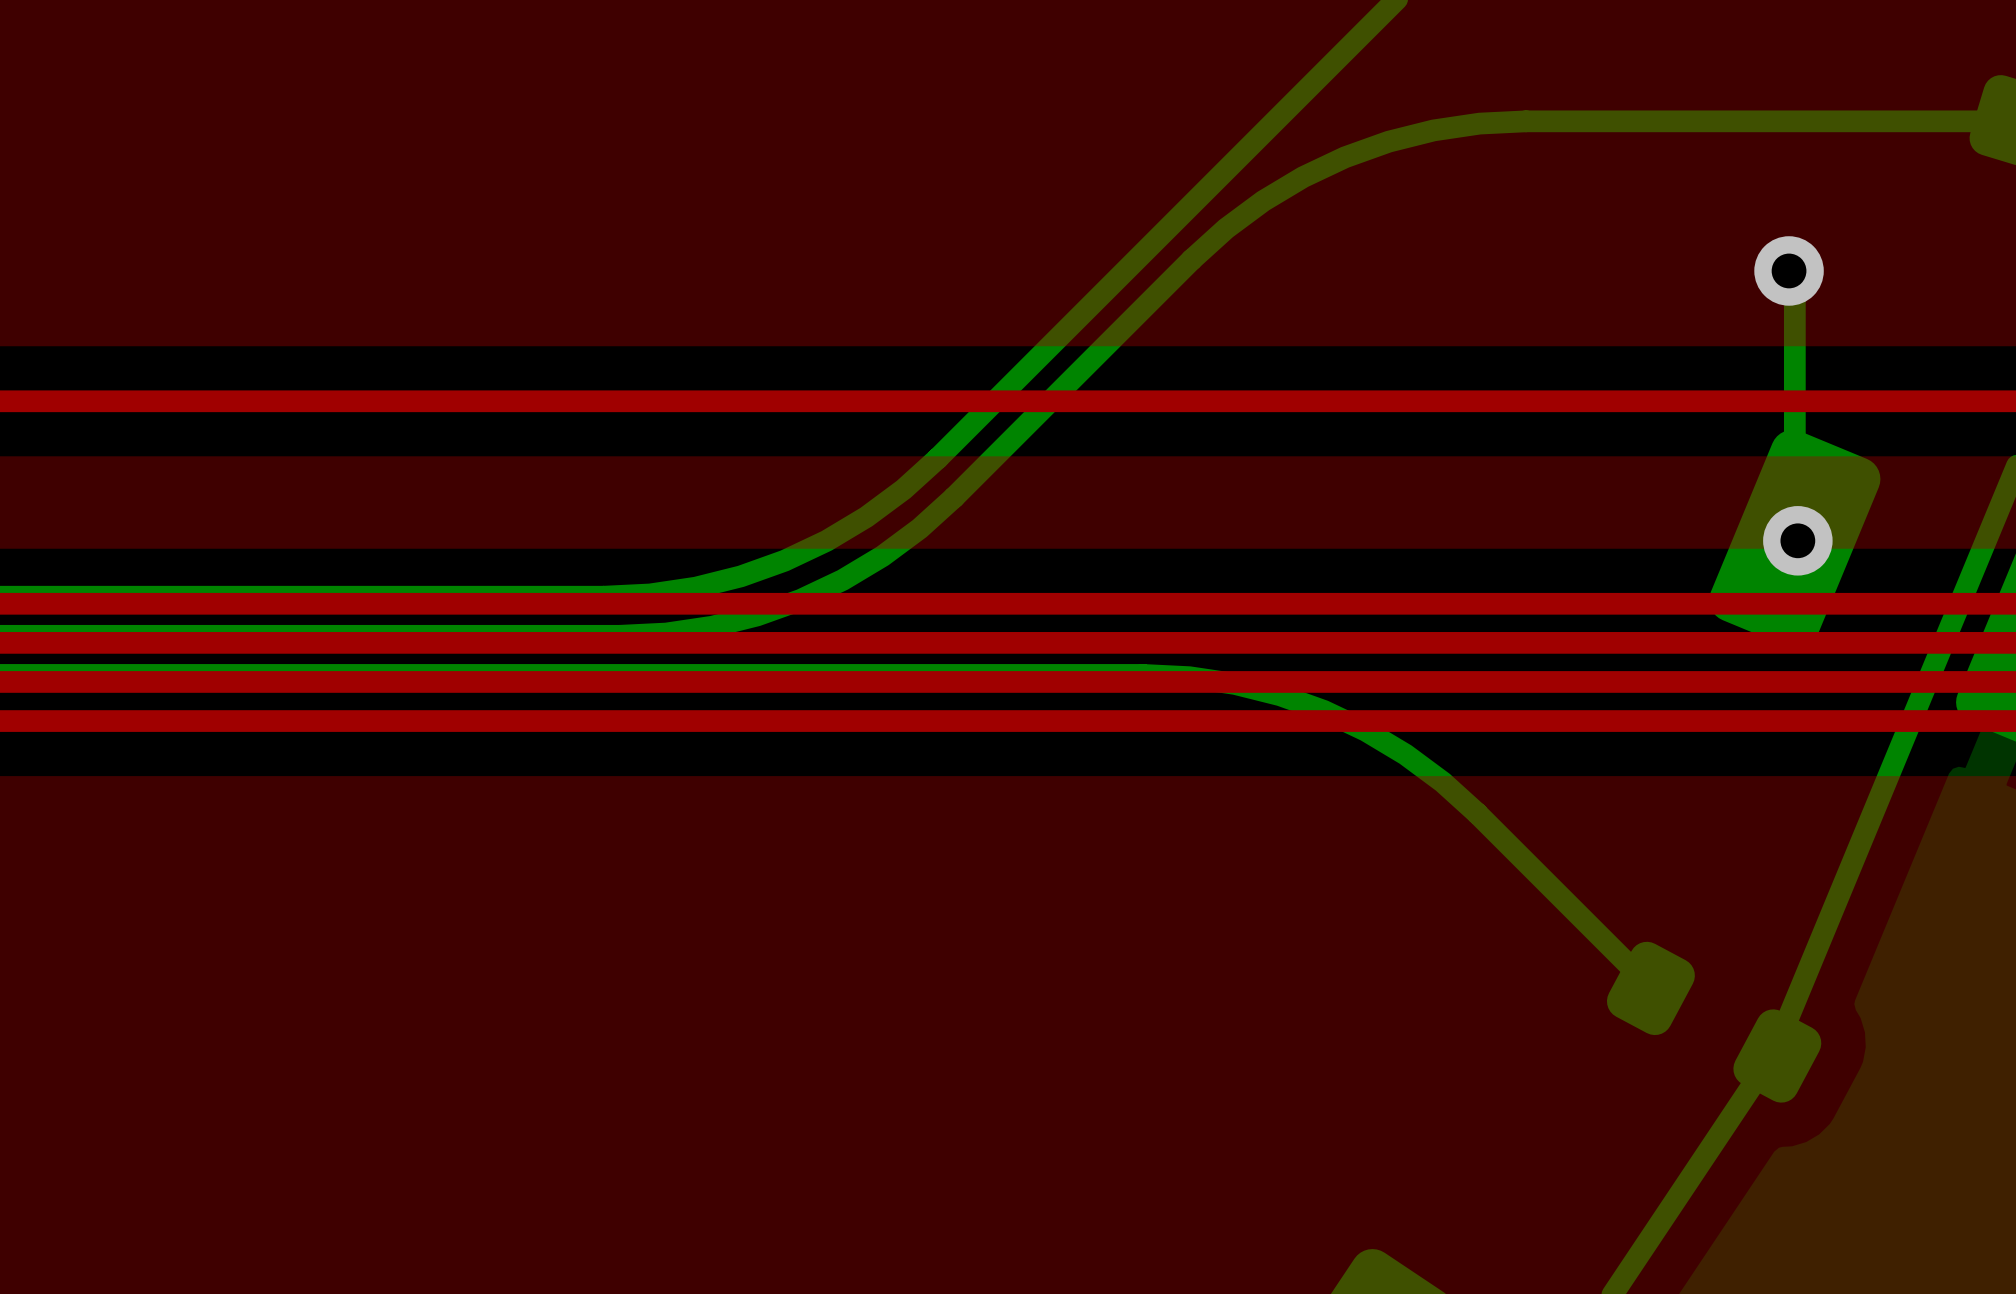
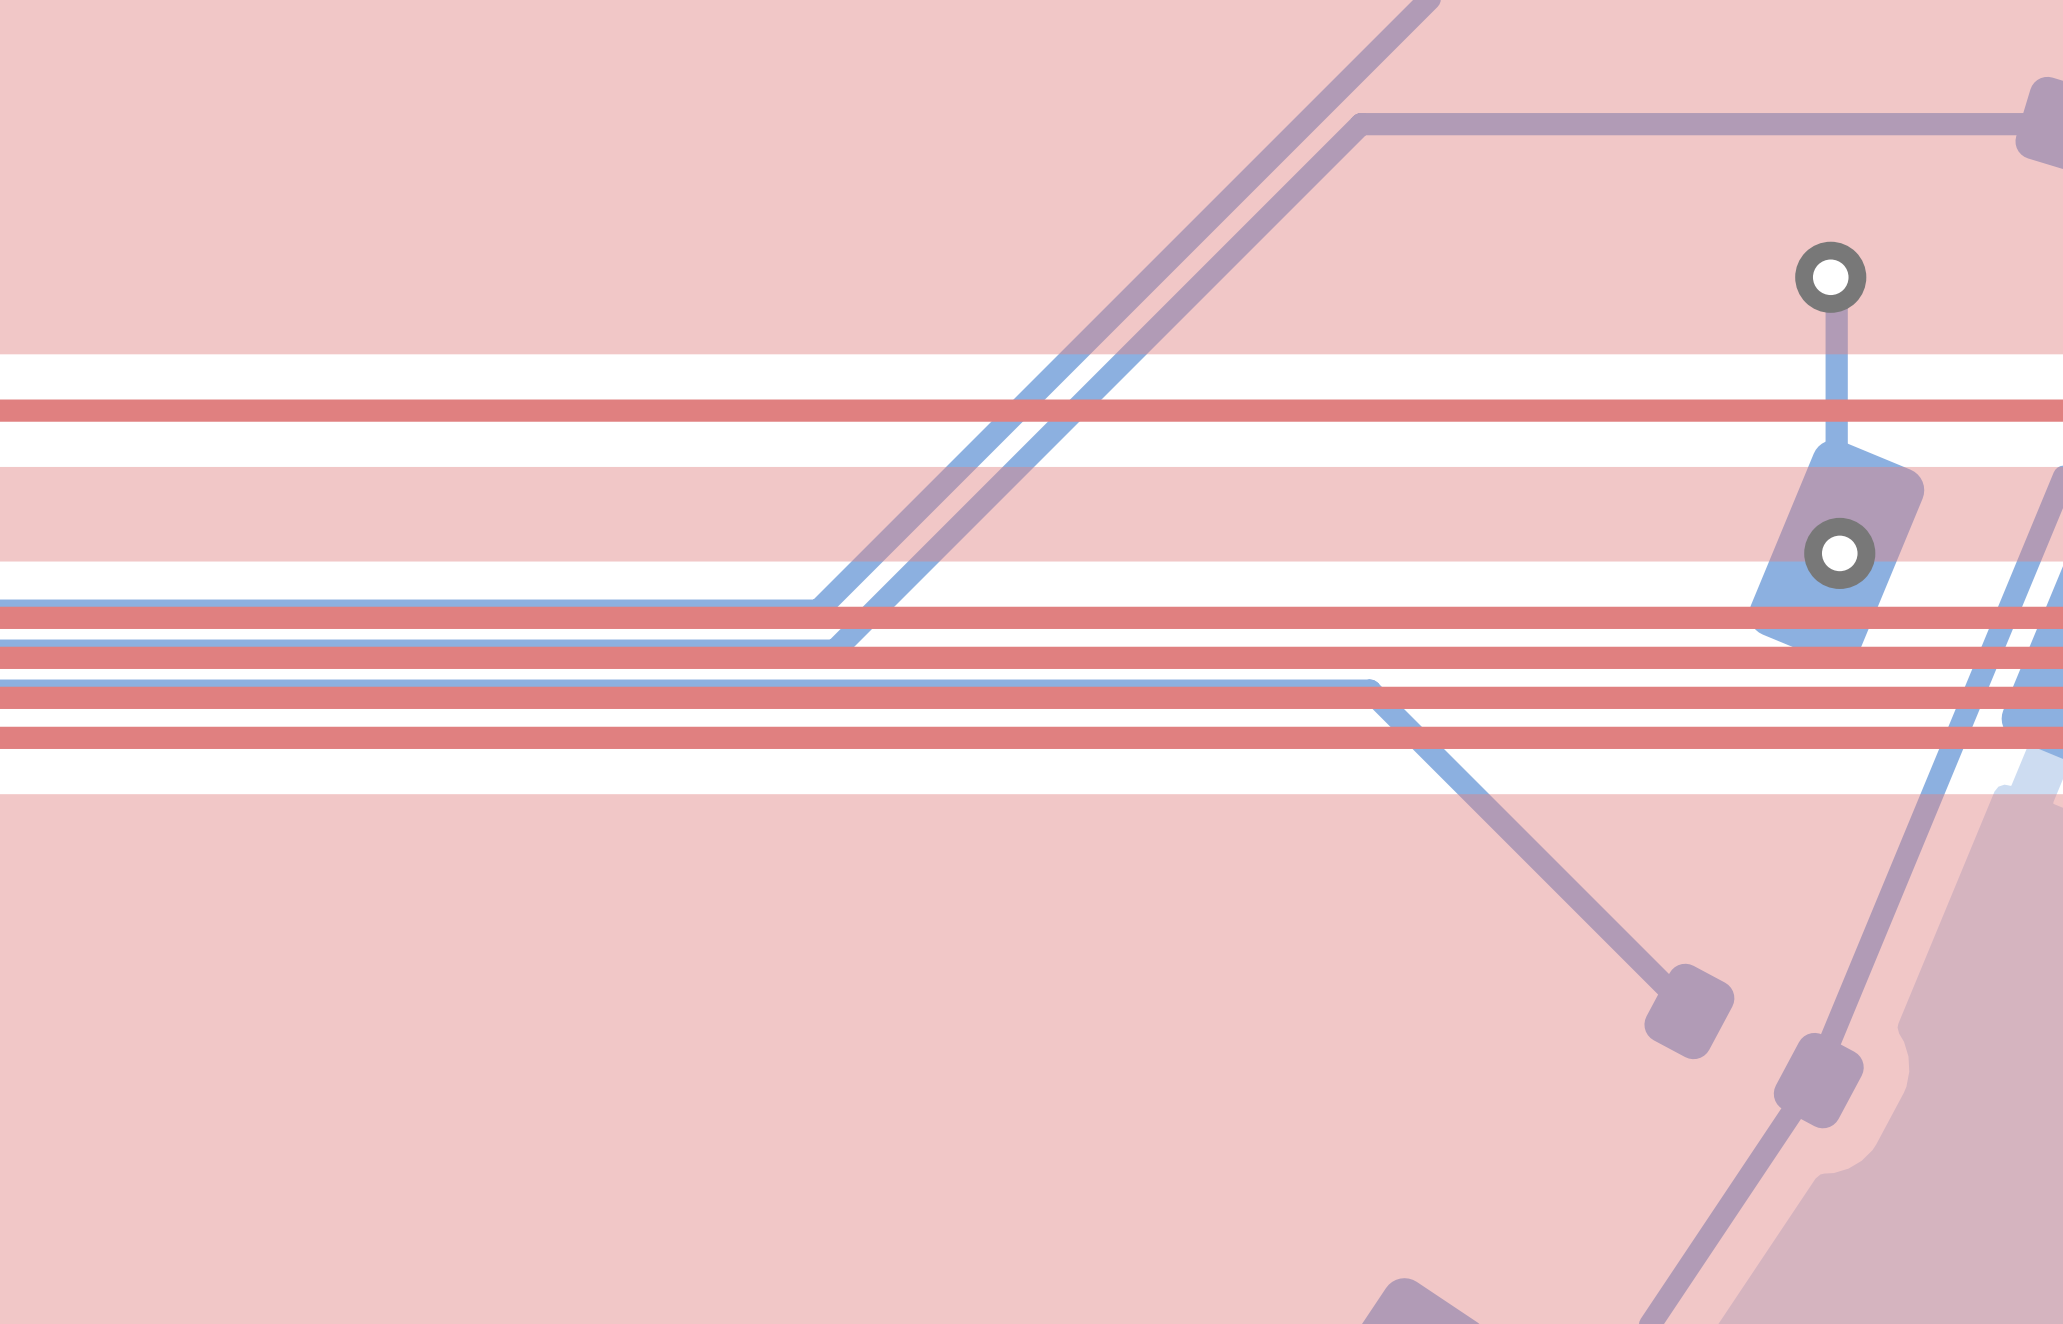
bottom track: (1525, 121) (1479, 123) (1433, 130) (1388, 141) (1345, 157) (1303, 177) (1263, 200) (1226, 228) (1191, 259) -> (1561, 124) (1361, 124) (1219, 265)
bottom track: (937, 458) (903, 489) (866, 517) (826, 540) (784, 560) (740, 576) (695, 587) (650, 594) (603, 596) -> (959, 468) (818, 610) (617, 610)
bottom track: (954, 497) (919, 528) (882, 556) (842, 580) (800, 599) (757, 615) (712, 626) (666, 633) (619, 635) -> (976, 508) (834, 650) (634, 650)
bottom track: (1142, 674) (1189, 677) (1235, 683) (1280, 695) (1323, 710) (1365, 730) (1405, 754) (1442, 782) (1477, 813) -> (1169, 690) (1369, 690) (1511, 832)

